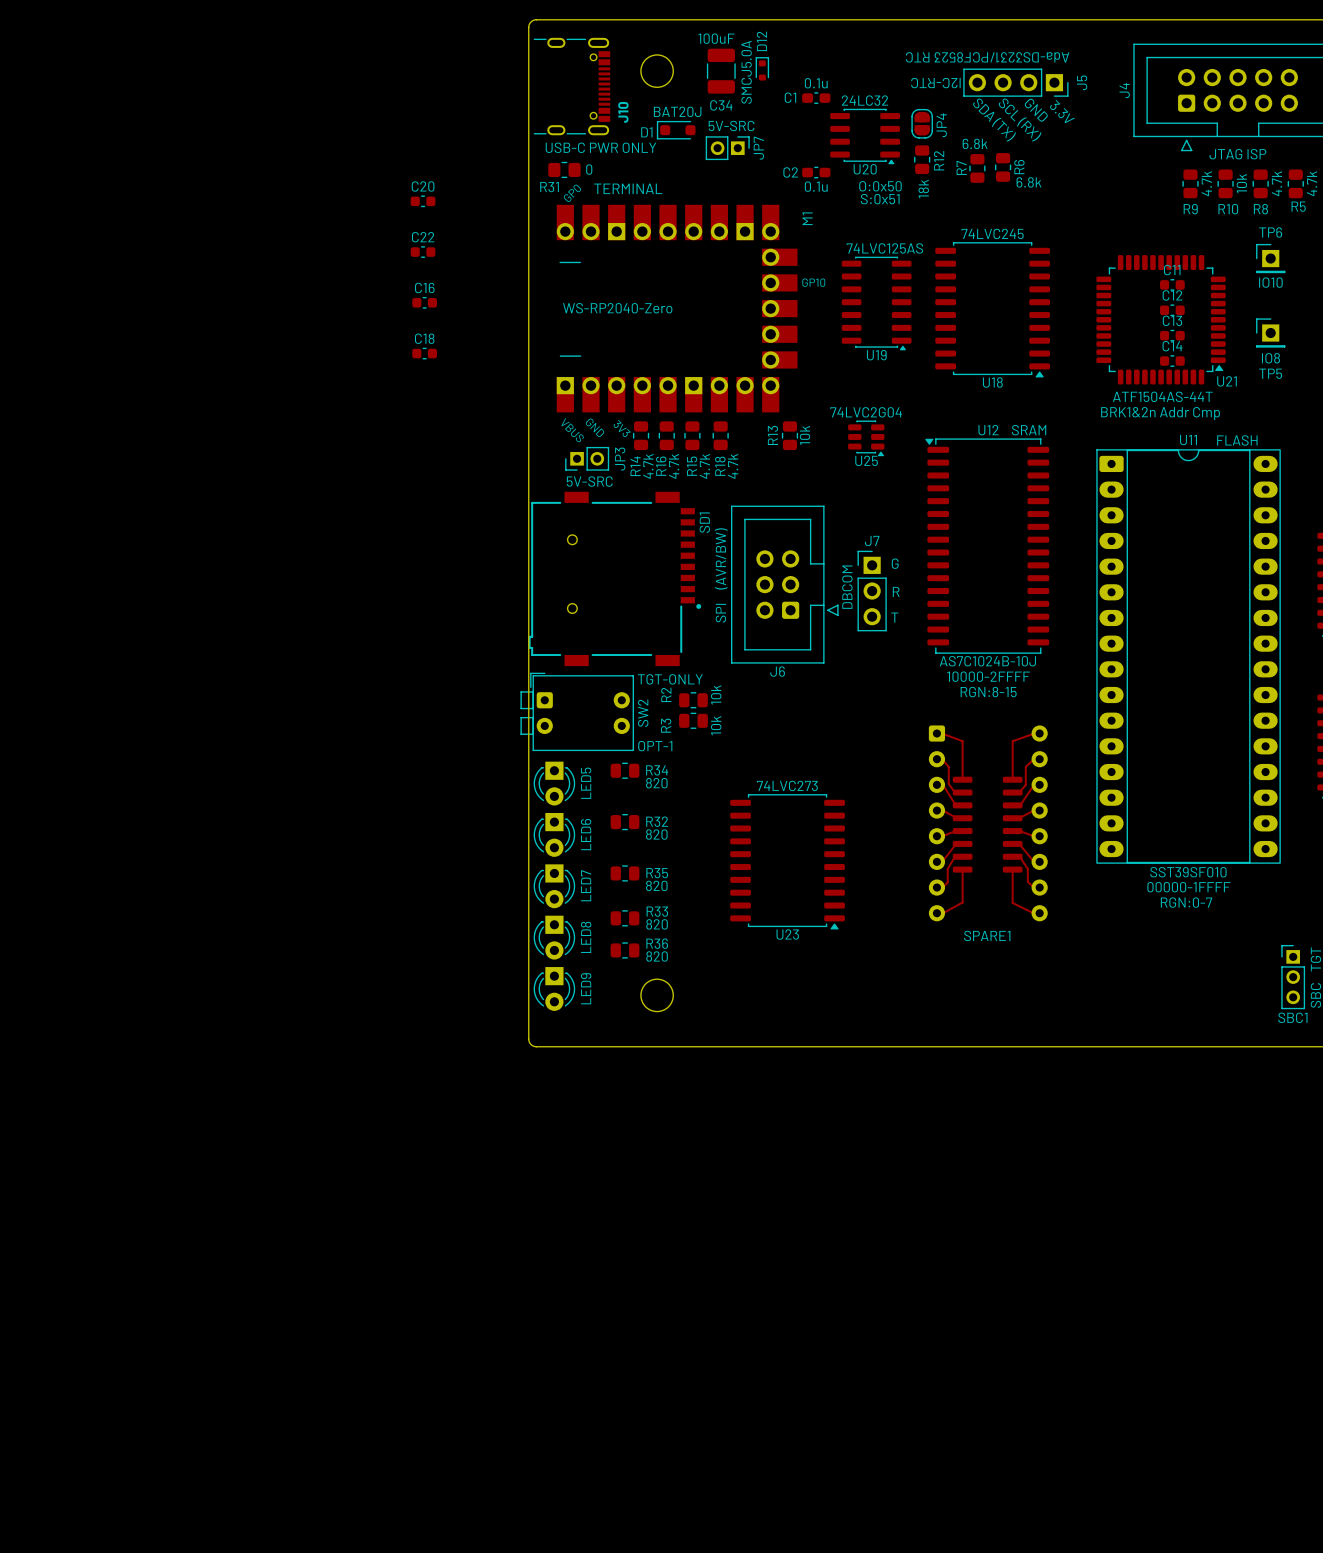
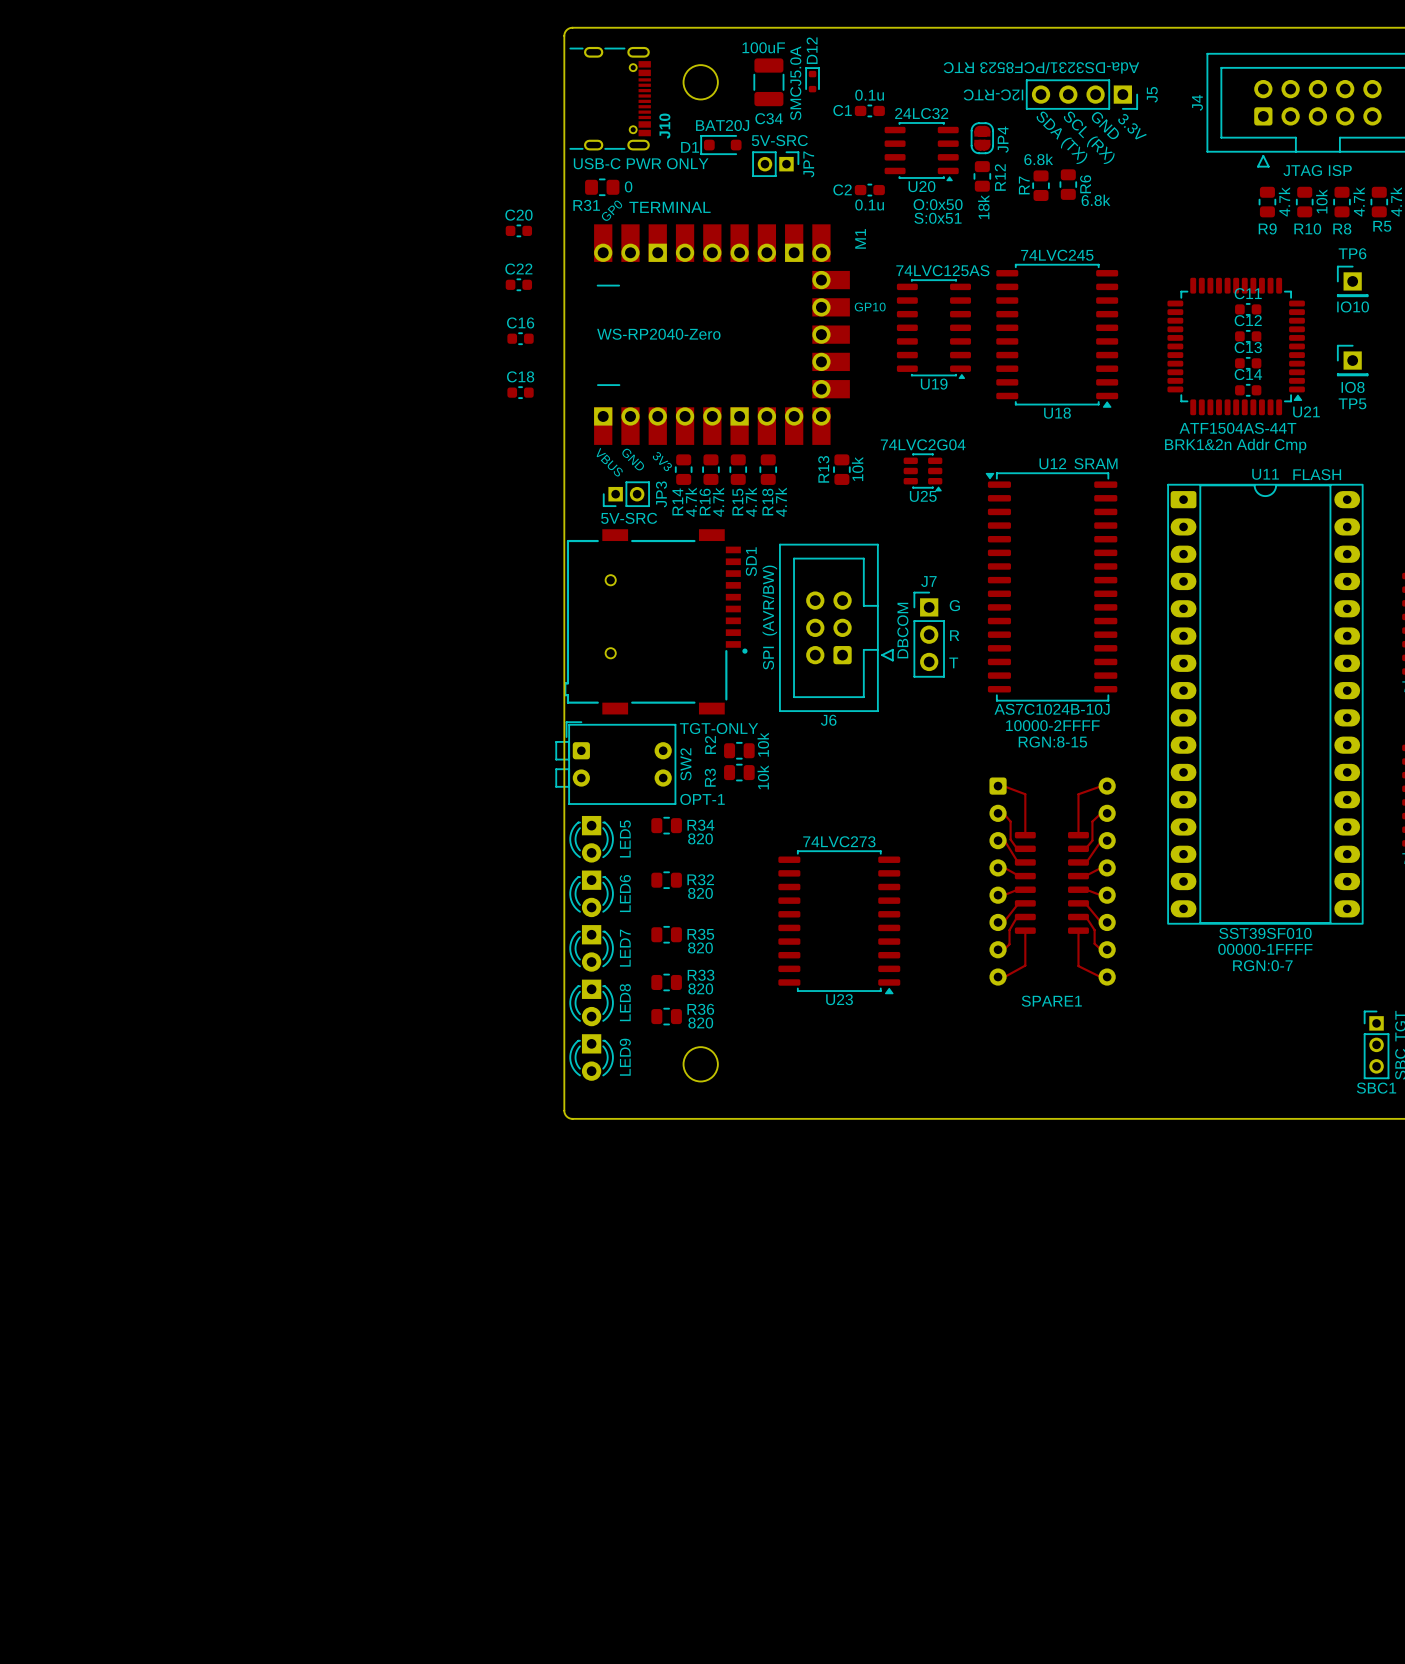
C20 position: (423, 201) -> (518, 230)
C22 position: (423, 252) -> (518, 284)
C16 position: (424, 302) -> (520, 338)
C18 position: (424, 353) -> (520, 392)

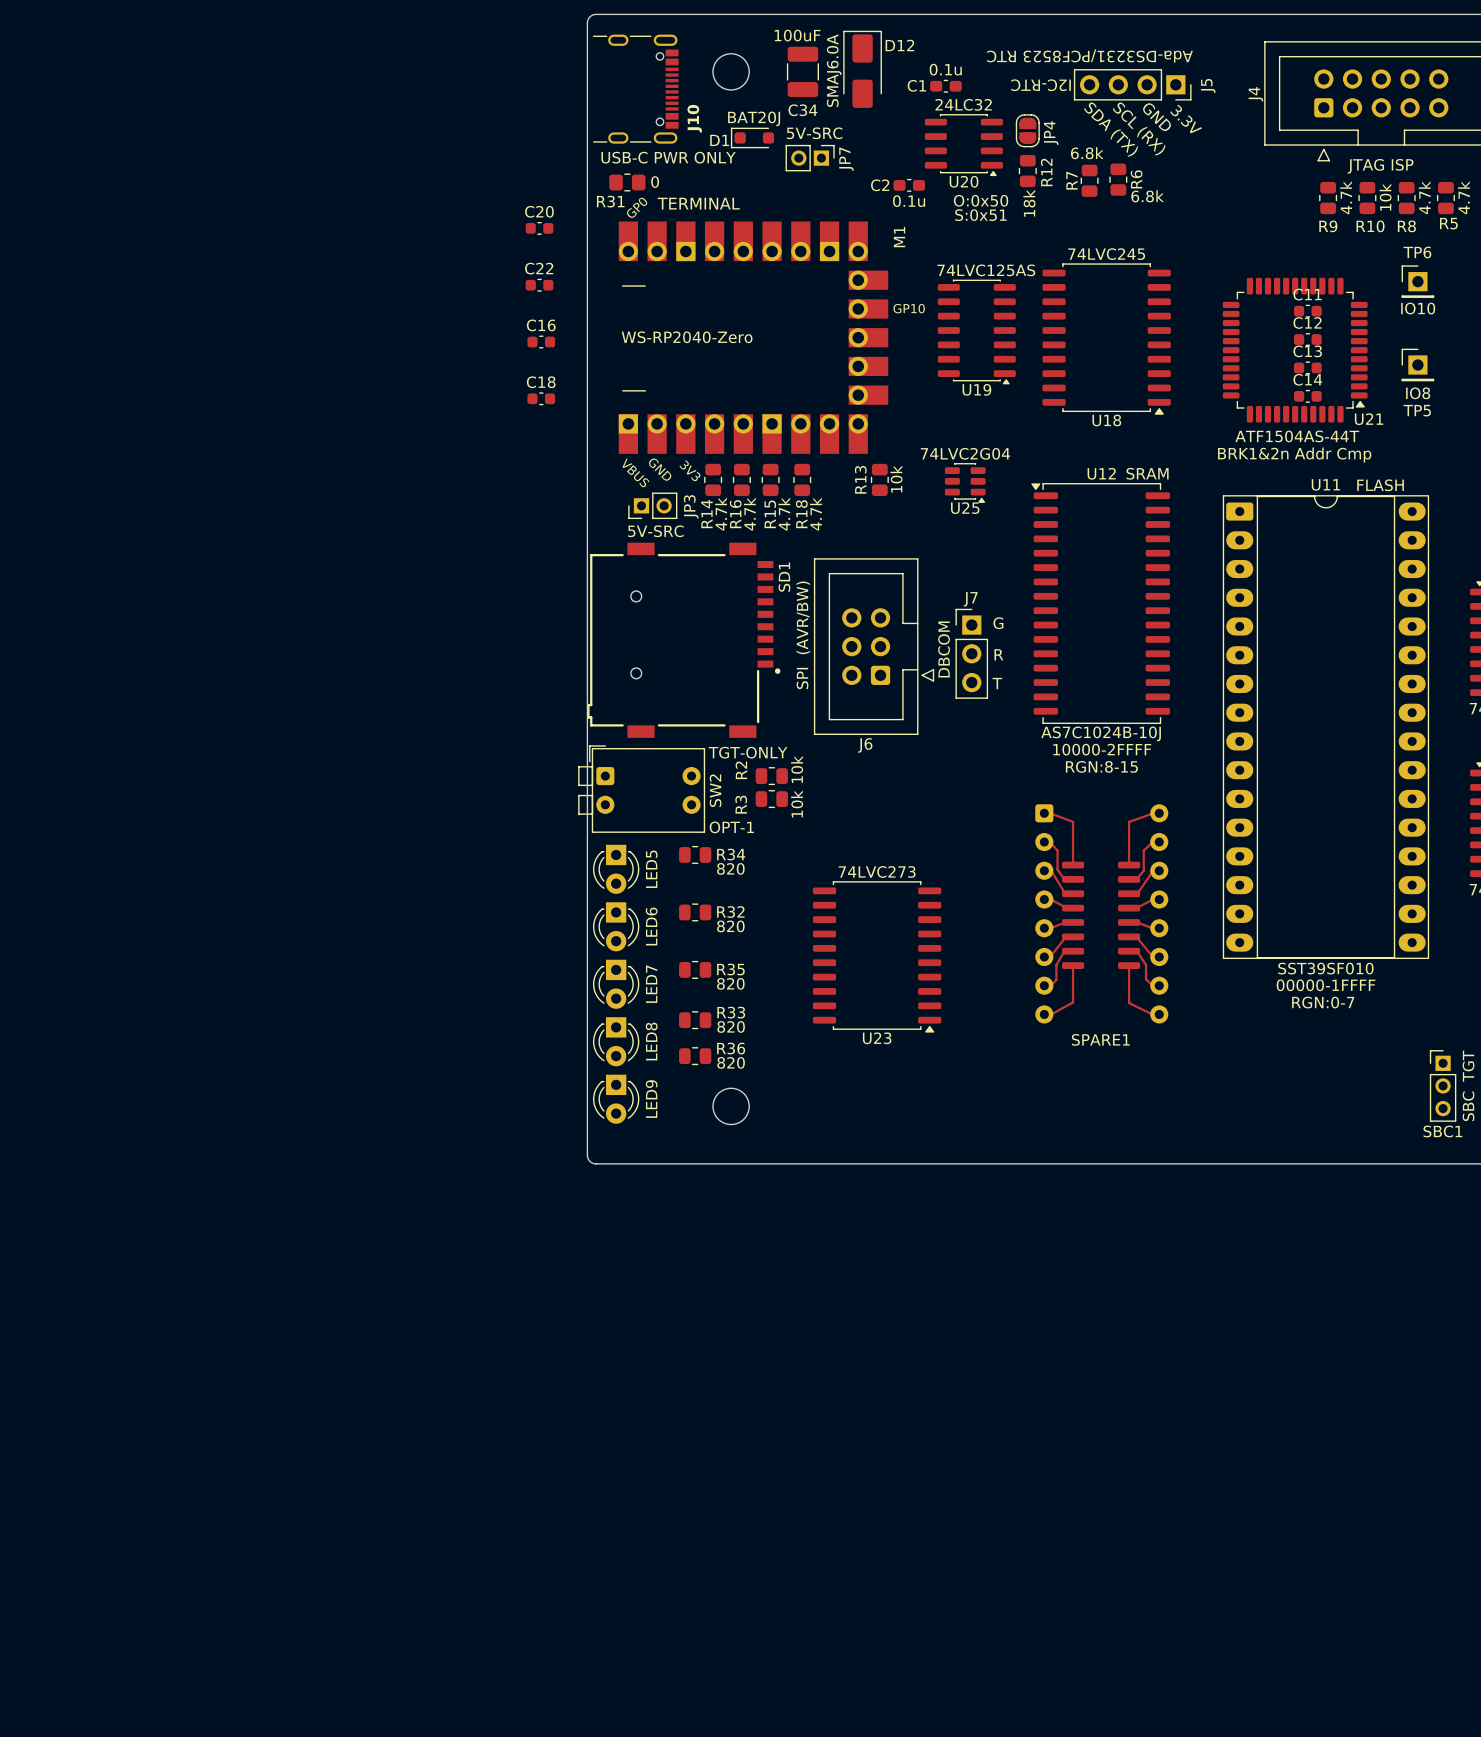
D12 name position: D12 (812, 50) -> D12 (899, 45)
D12 footprint: [805, 67, 820, 93] -> [843, 30, 882, 108]
D12 value: SMCJ5.0A (795, 83) -> SMAJ6.0A (834, 70)
C1 position: (869, 110) -> (945, 86)

